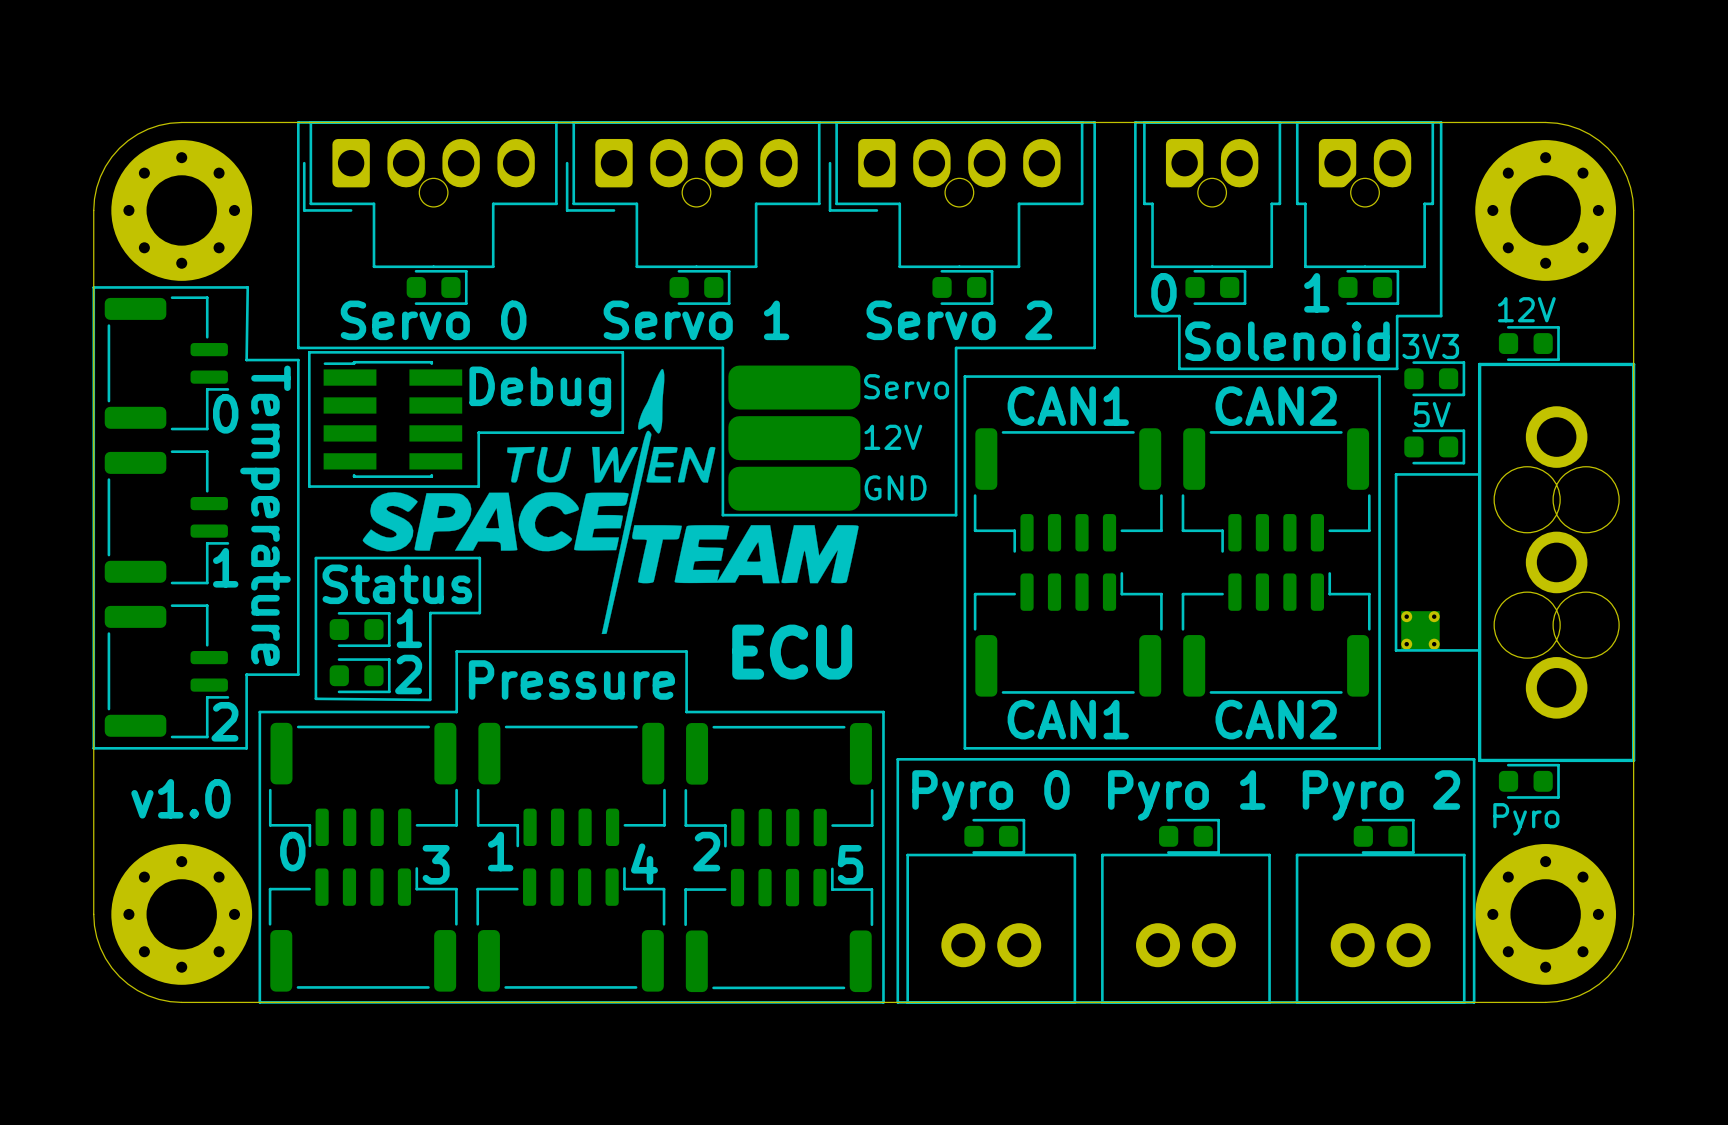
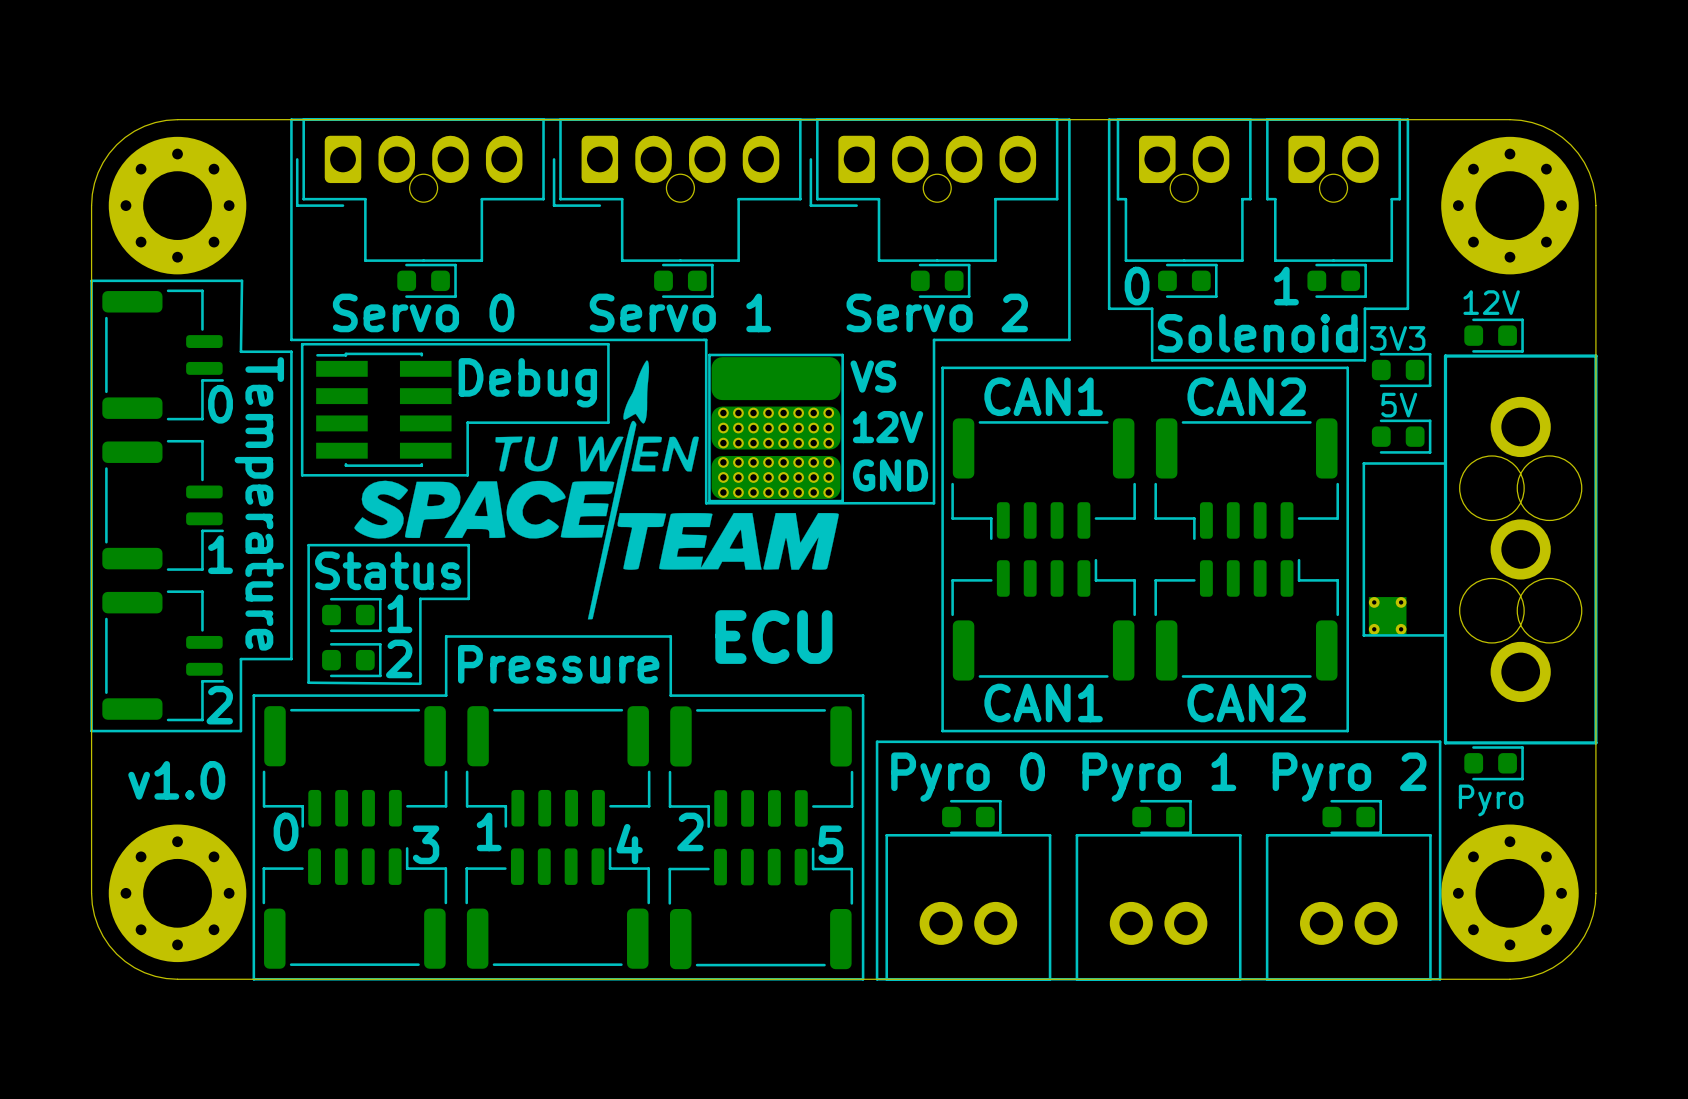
text: none -> VS (873, 376)
part: Servo (794, 387) -> none
part footprint: [728, 416, 861, 461] -> [708, 353, 844, 503]
part value: 12V (893, 437) -> none
text: none -> 12V (888, 427)
text: none -> GND (890, 475)
part: GND (794, 488) -> none

